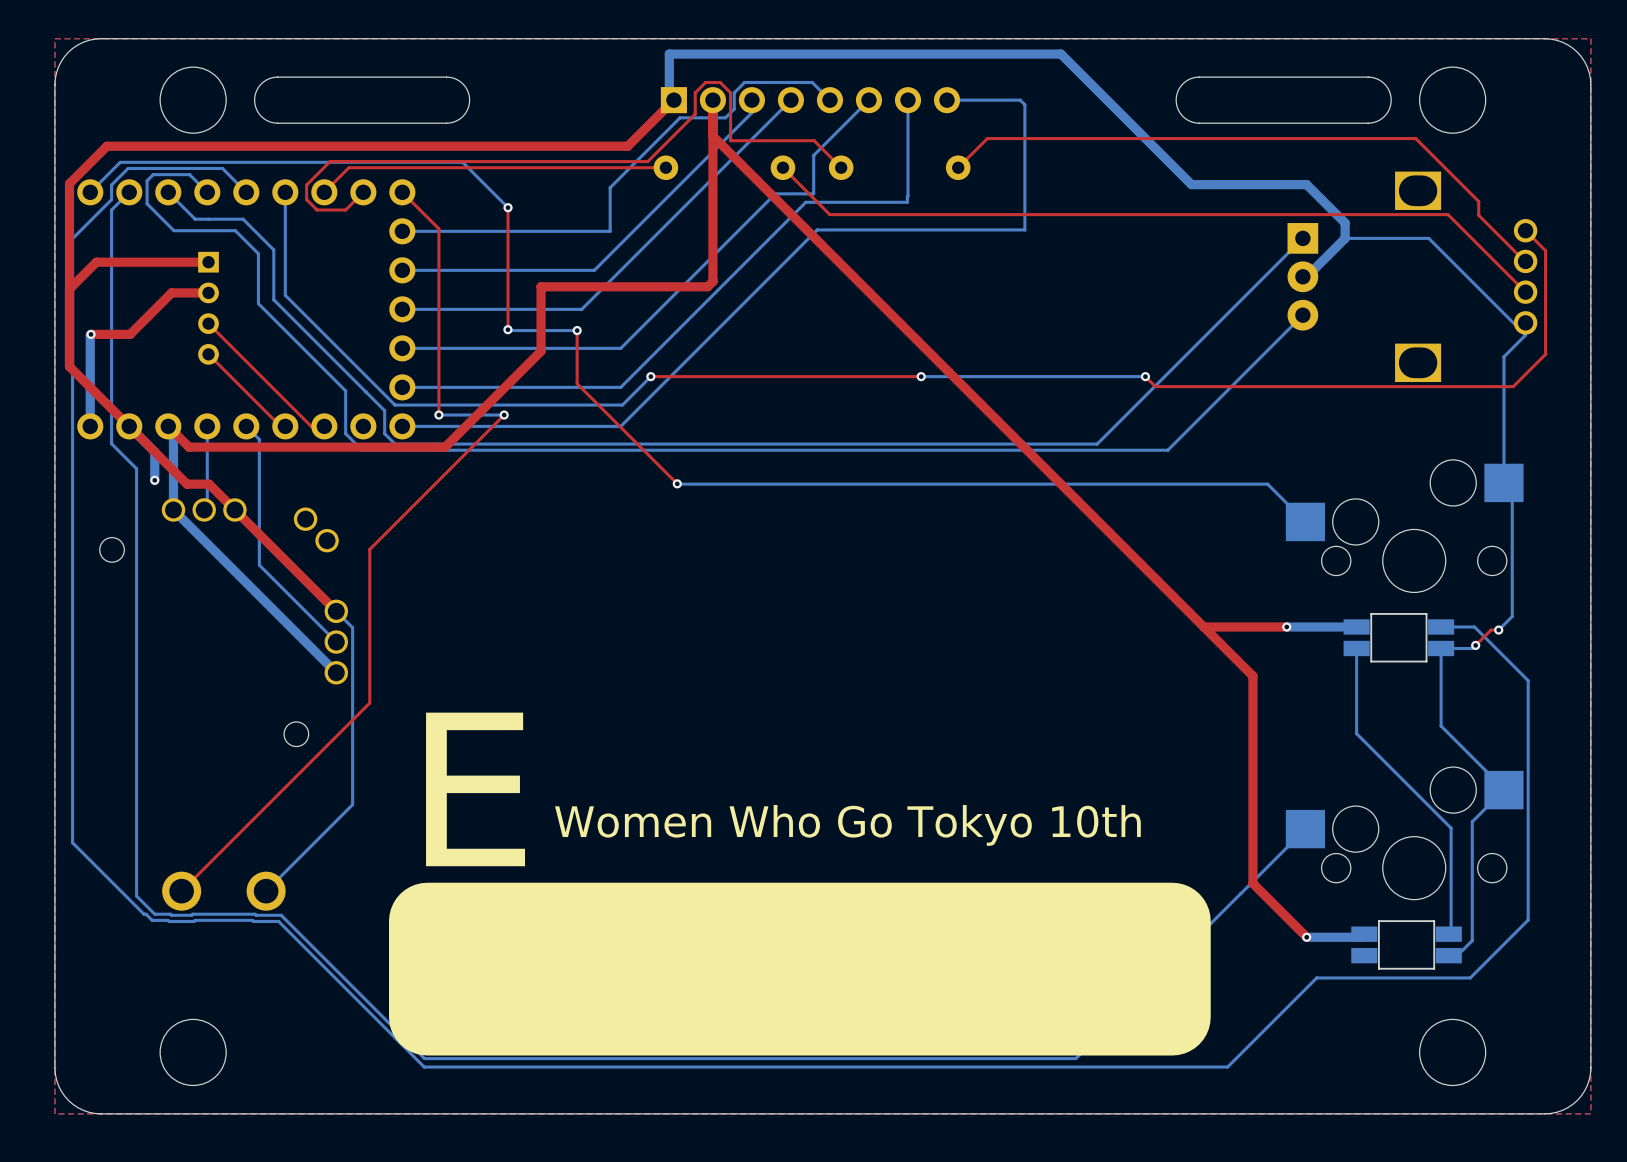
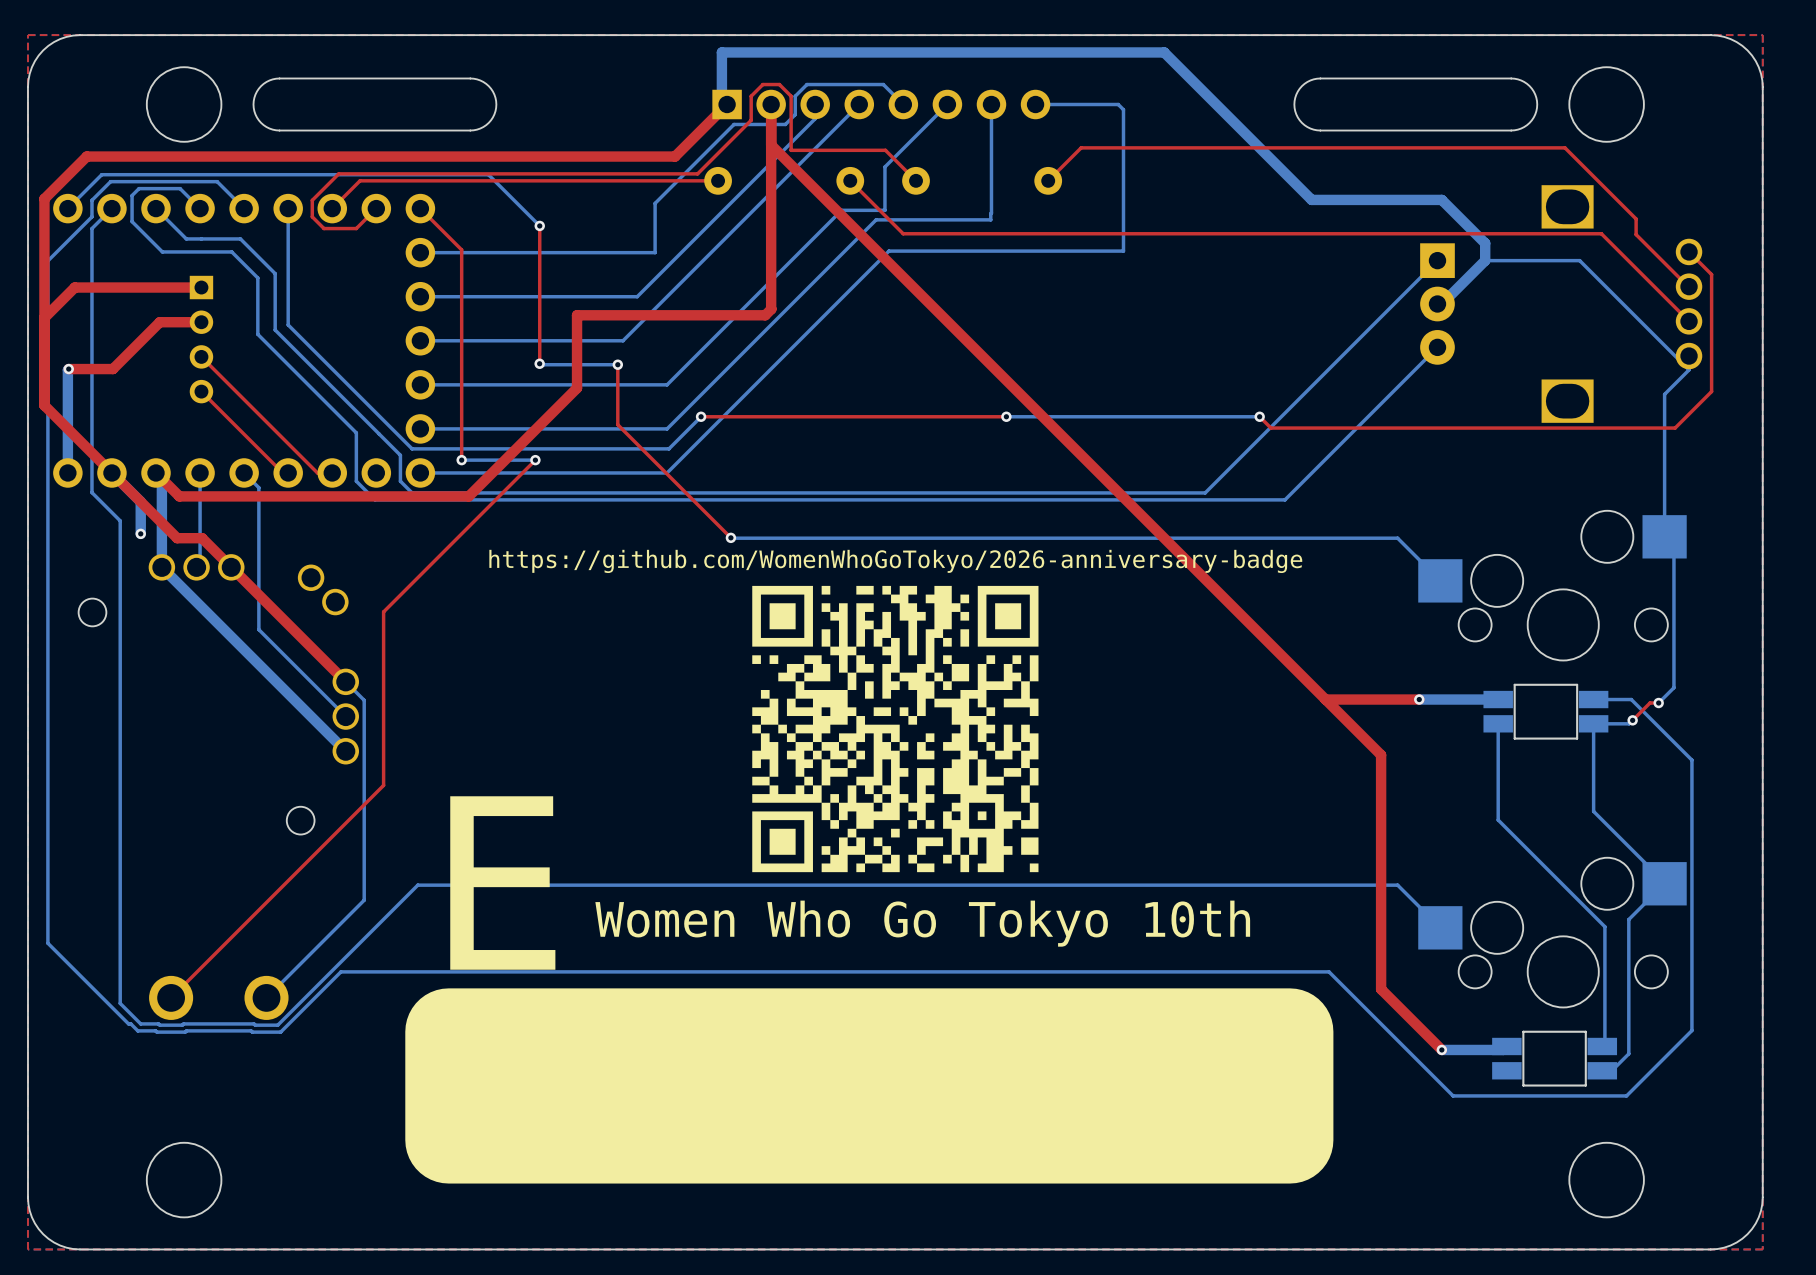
drawing: none -> [752, 585, 1039, 873]
bottom track: (1305, 829) (1075, 1058) (424, 1058) (281, 915) (276, 915) -> (1440, 927) (1397, 885) (417, 885) (277, 1025)
bottom track: (278, 921) (424, 1067) (1227, 1067) (1316, 977) -> (280, 1032) (340, 971) (1329, 971) (1453, 1095)

